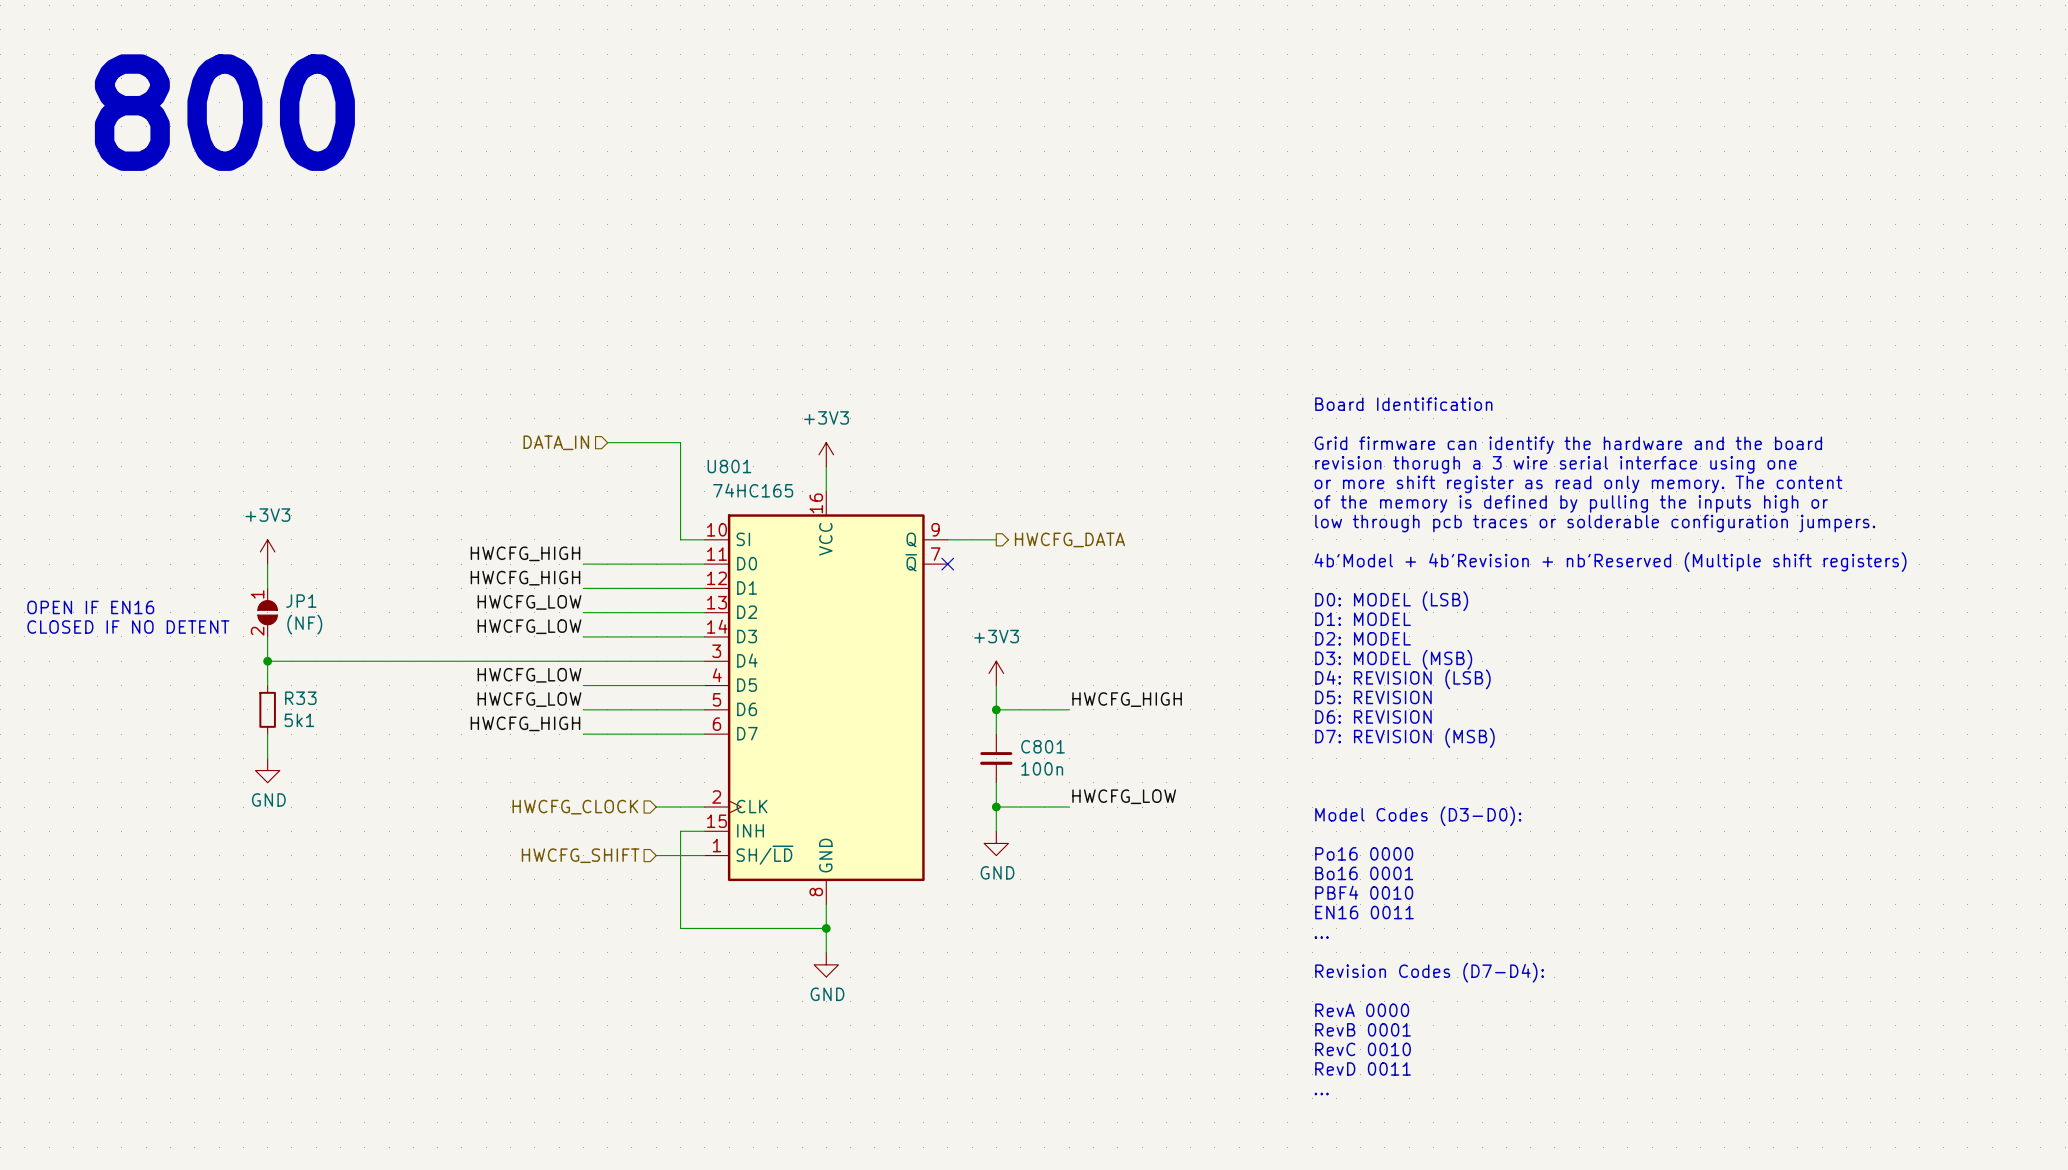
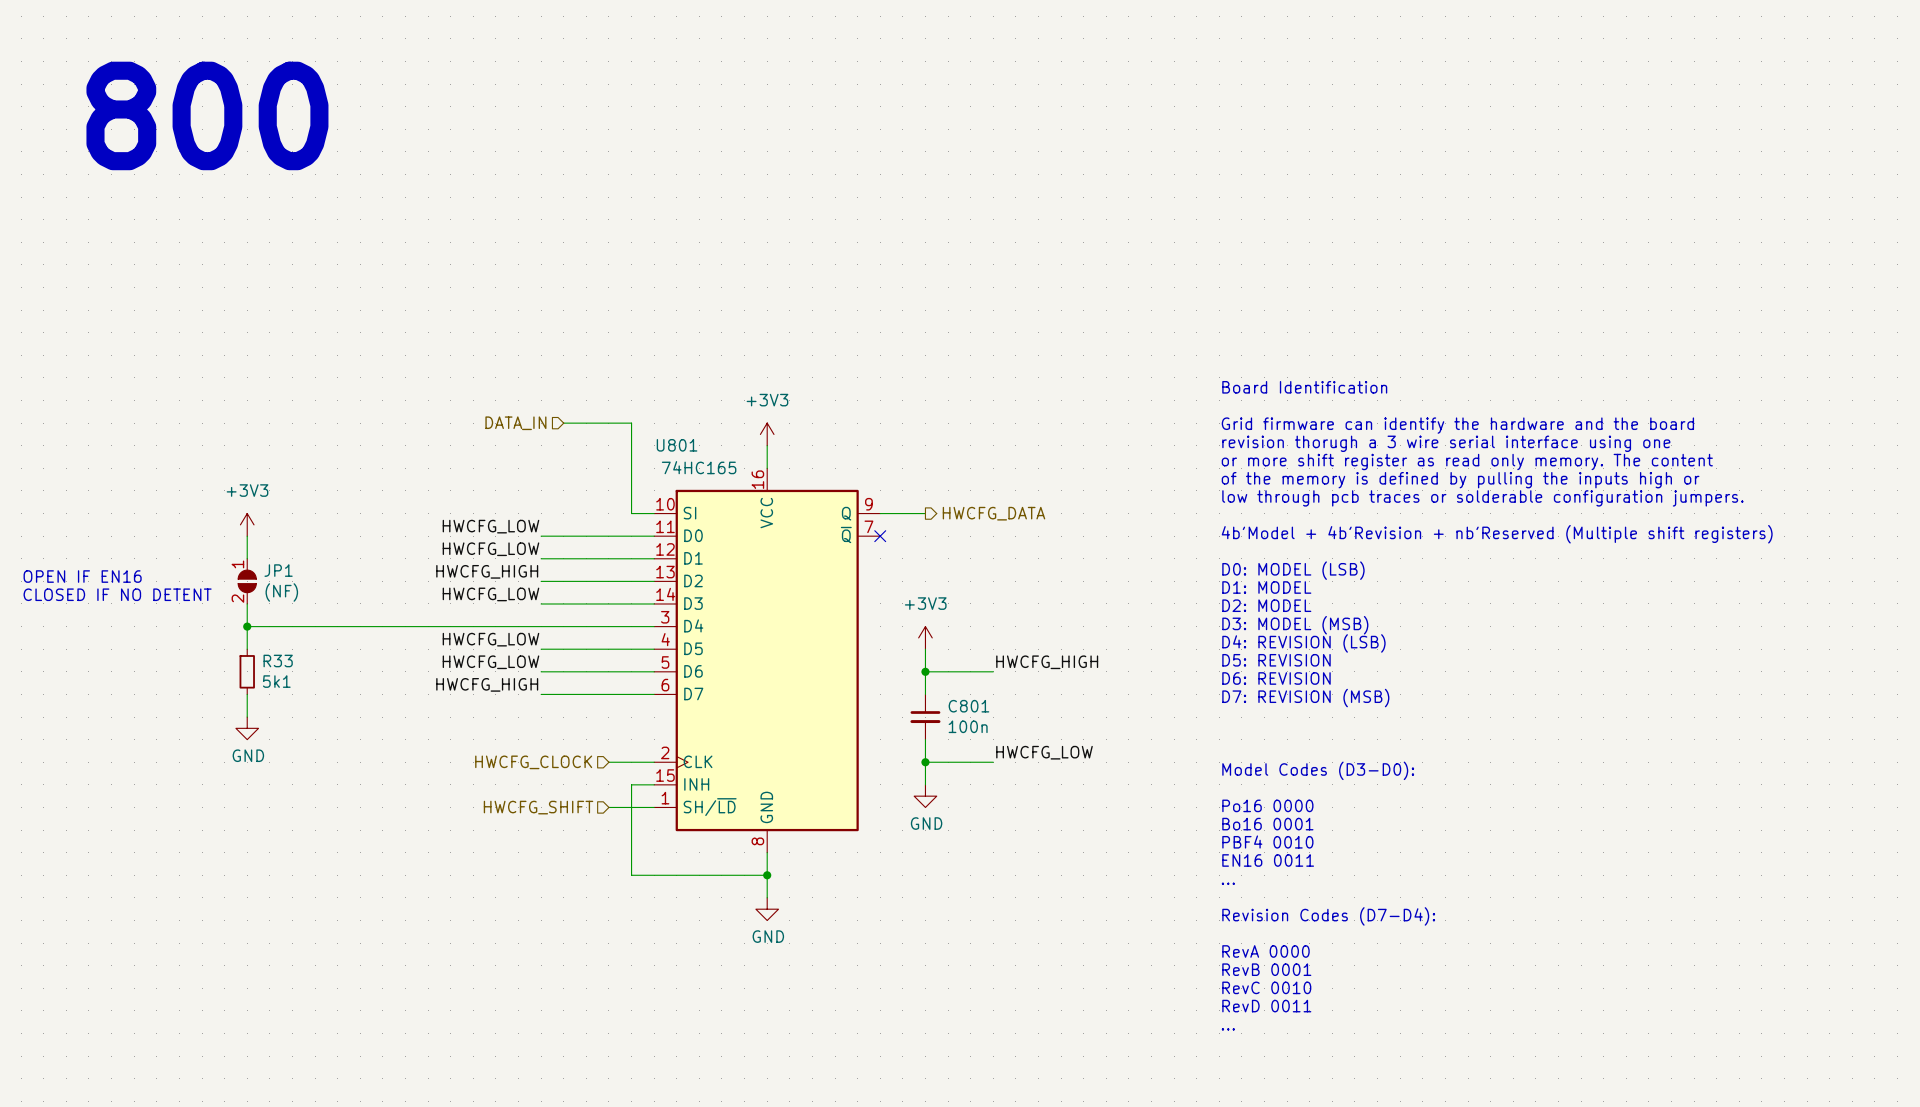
label: HWCFG_HIGH (525, 553) -> HWCFG_LOW (490, 526)
label: HWCFG_HIGH (525, 578) -> HWCFG_LOW (490, 549)
label: HWCFG_LOW (529, 602) -> HWCFG_HIGH (487, 571)

